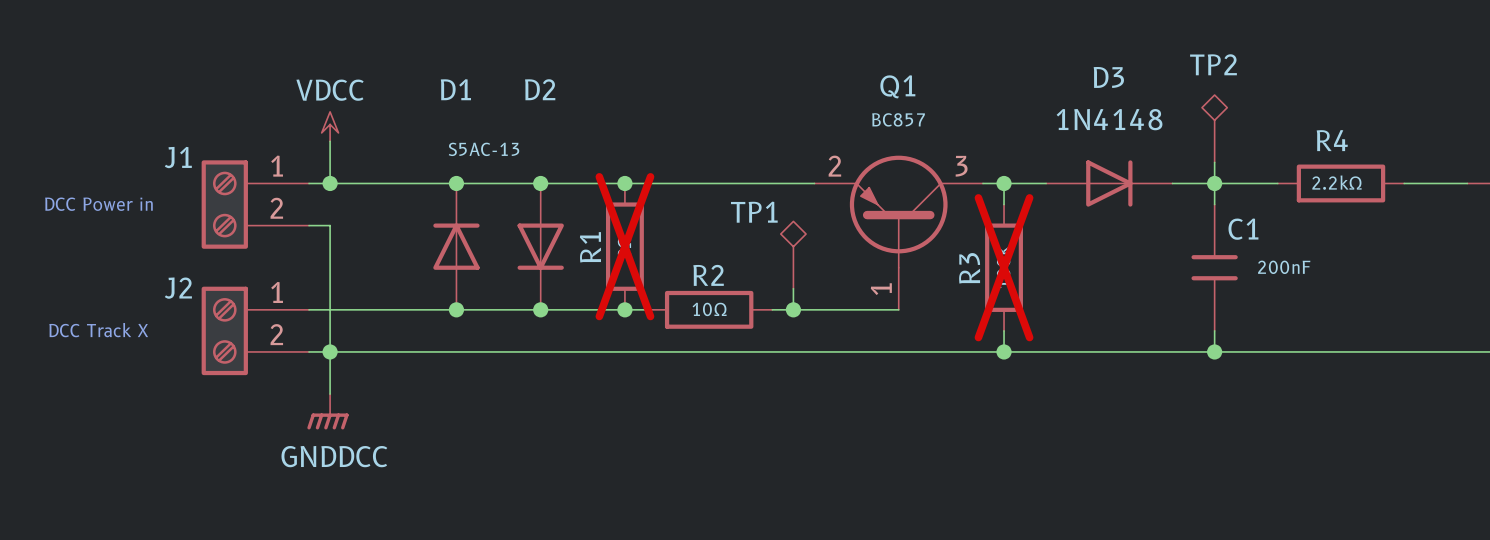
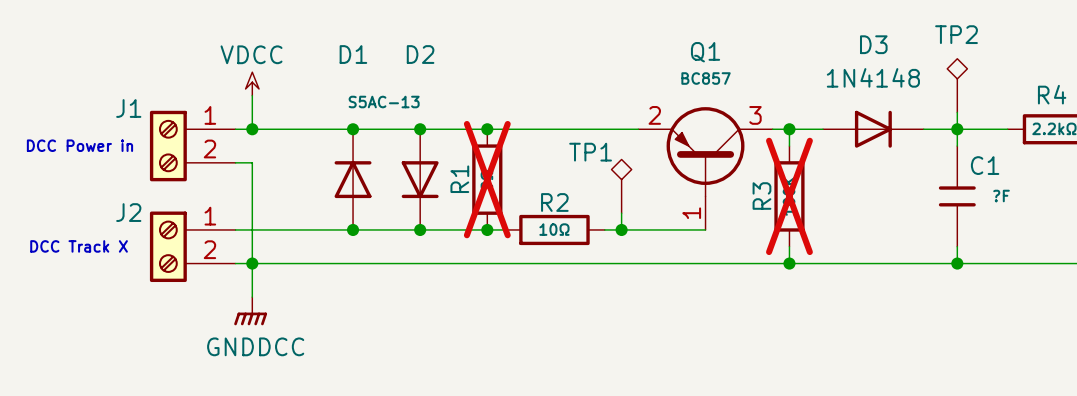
C1 value: 200nF (1284, 267) -> ?F (1001, 196)

